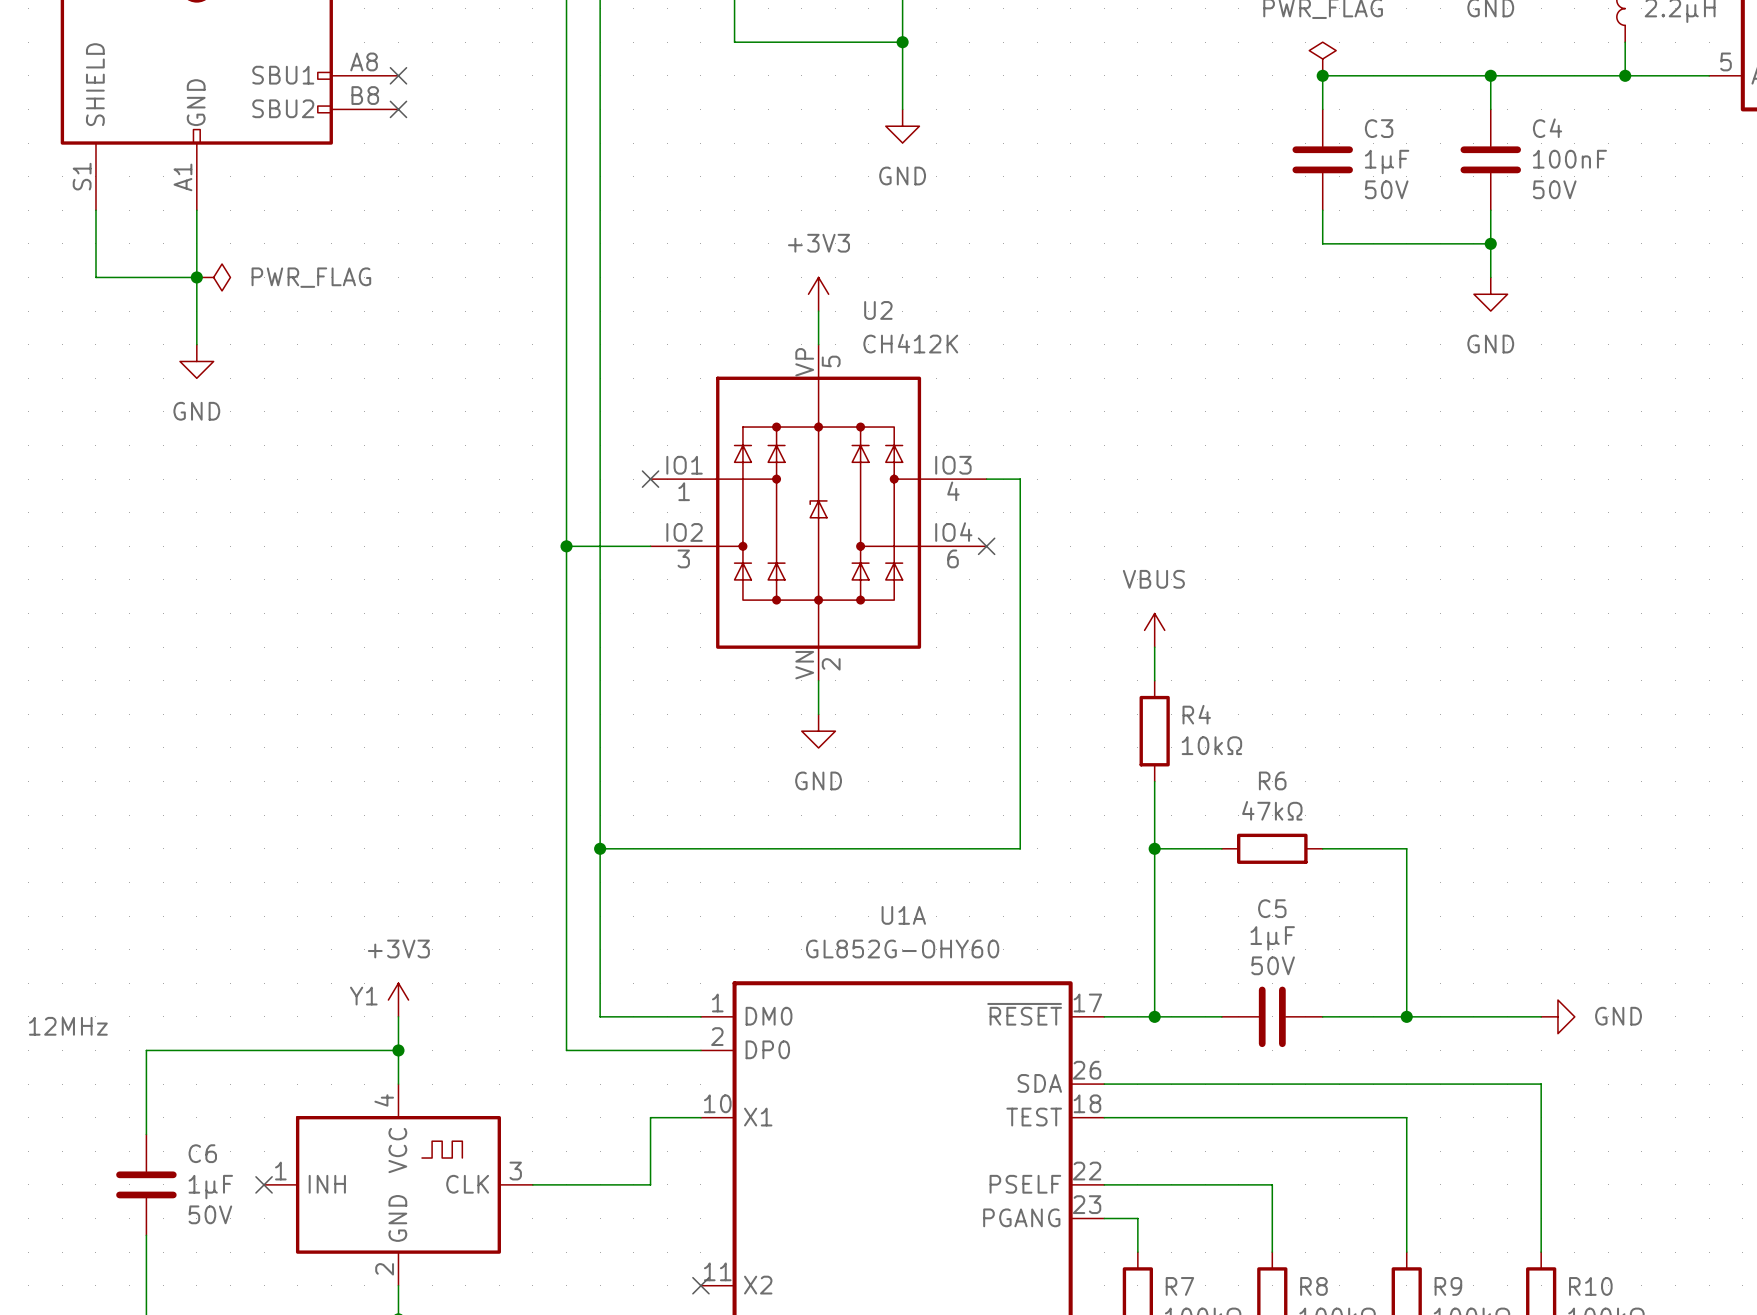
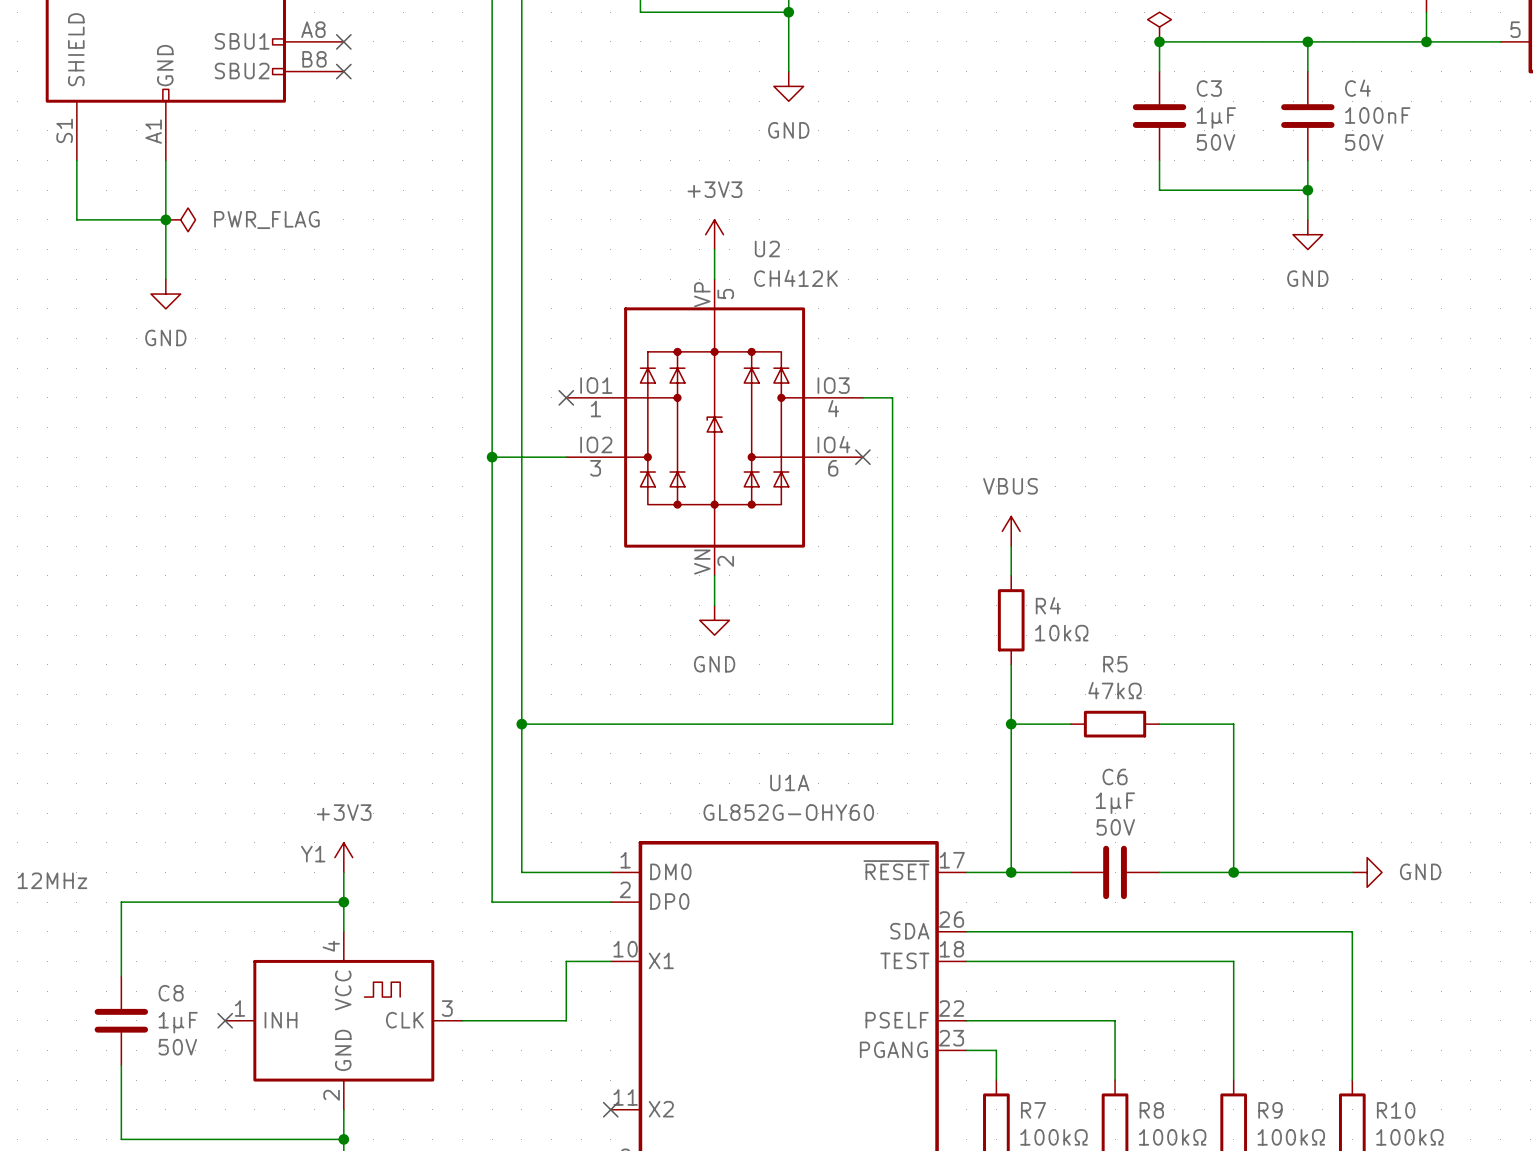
R6 name: R6 (1272, 780) -> R5 (1115, 664)
C5 name: C5 (1272, 908) -> C6 (1115, 776)
C6 name: C6 (202, 1153) -> C8 (171, 993)

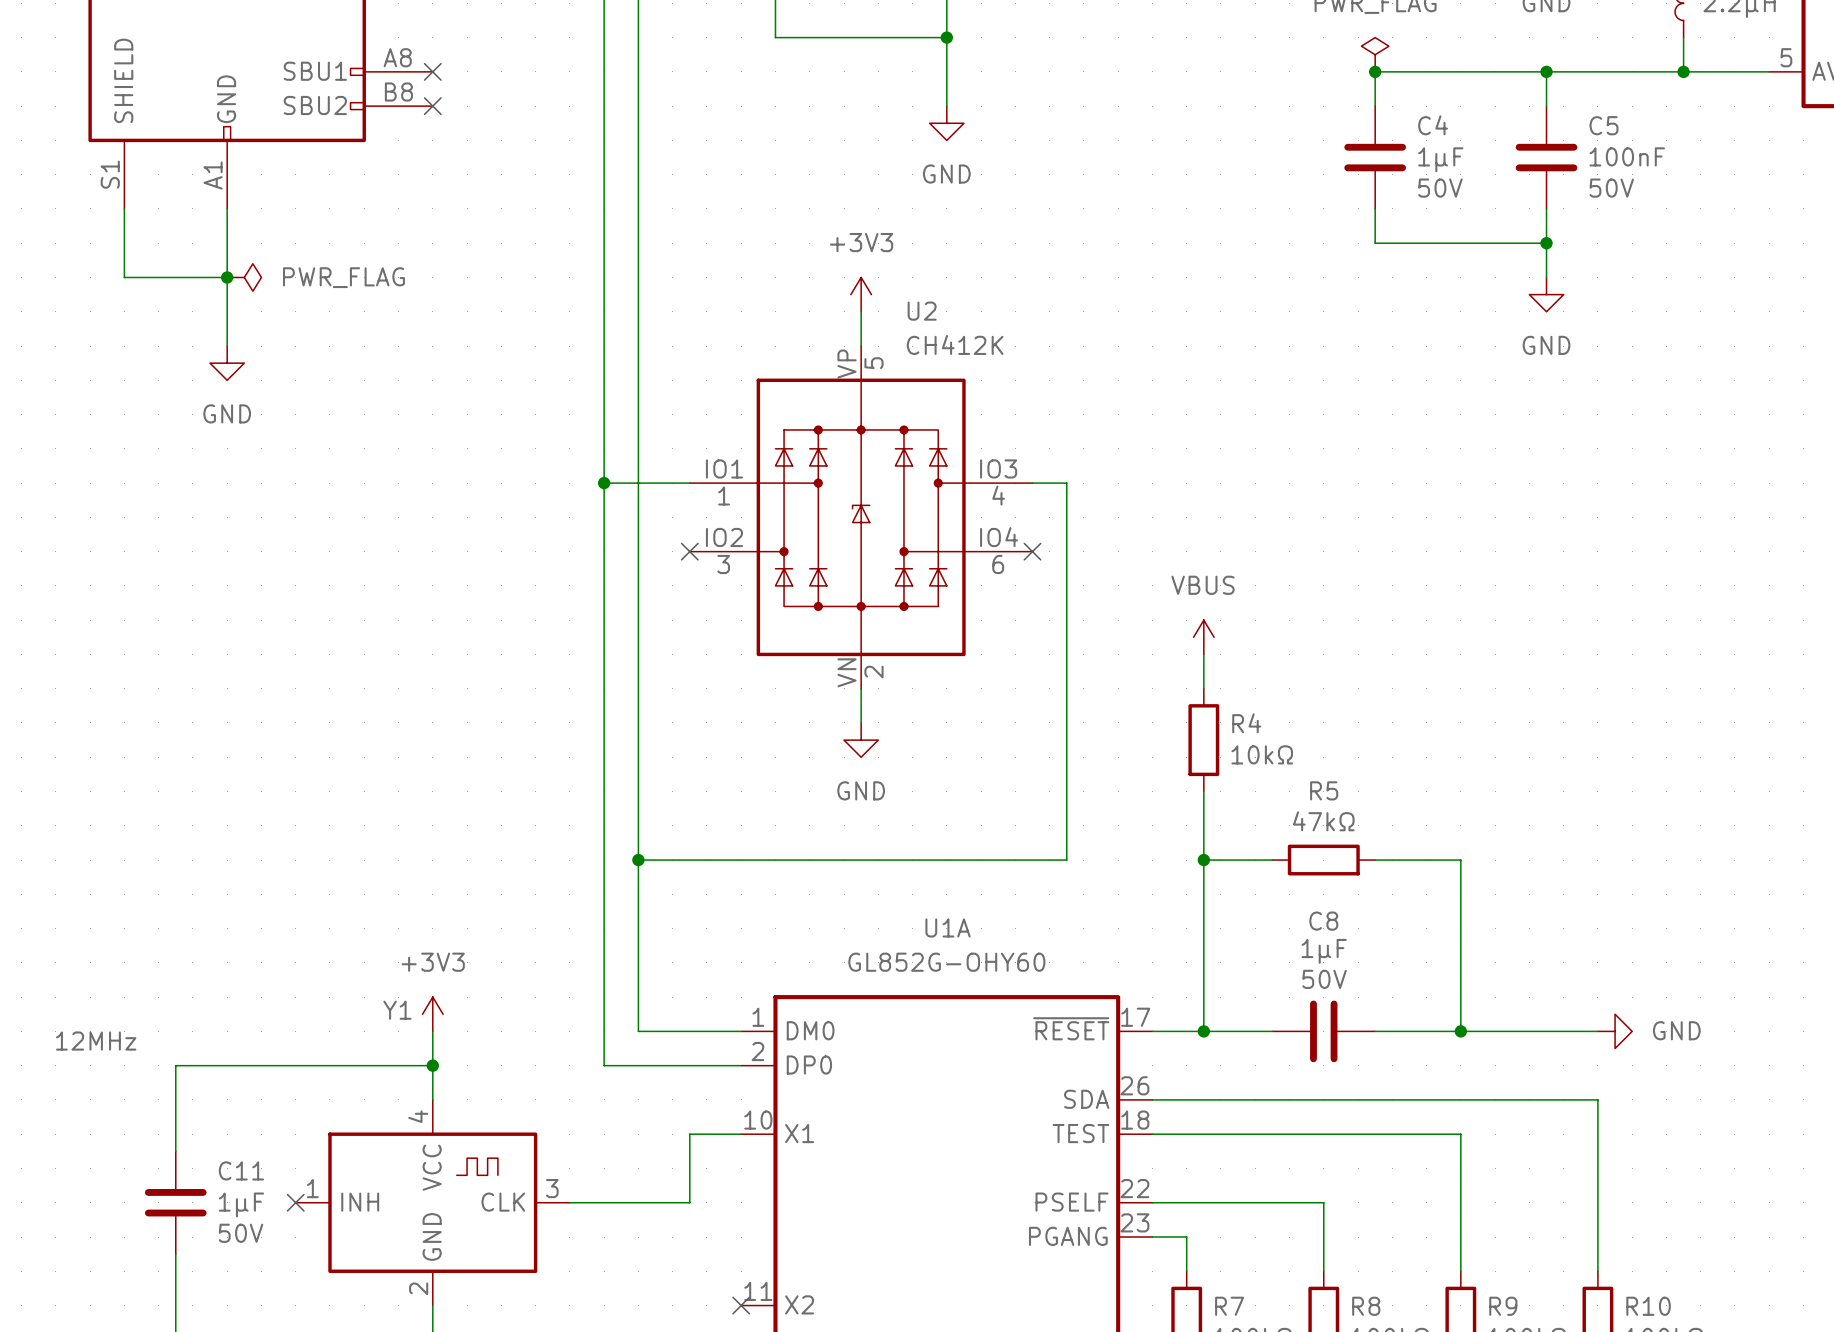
C3 name: C3 (1209, 88) -> C4 (1433, 125)
C4 name: C4 (1357, 88) -> C5 (1604, 125)
no-connect mark position: (566, 397) -> (689, 551)
wire: (492, 457) (566, 457) -> (604, 483) (689, 483)
junction position: (492, 457) -> (604, 483)
C6 name: C6 (1115, 776) -> C8 (1323, 921)
C8 name: C8 (171, 993) -> C11 (241, 1170)

